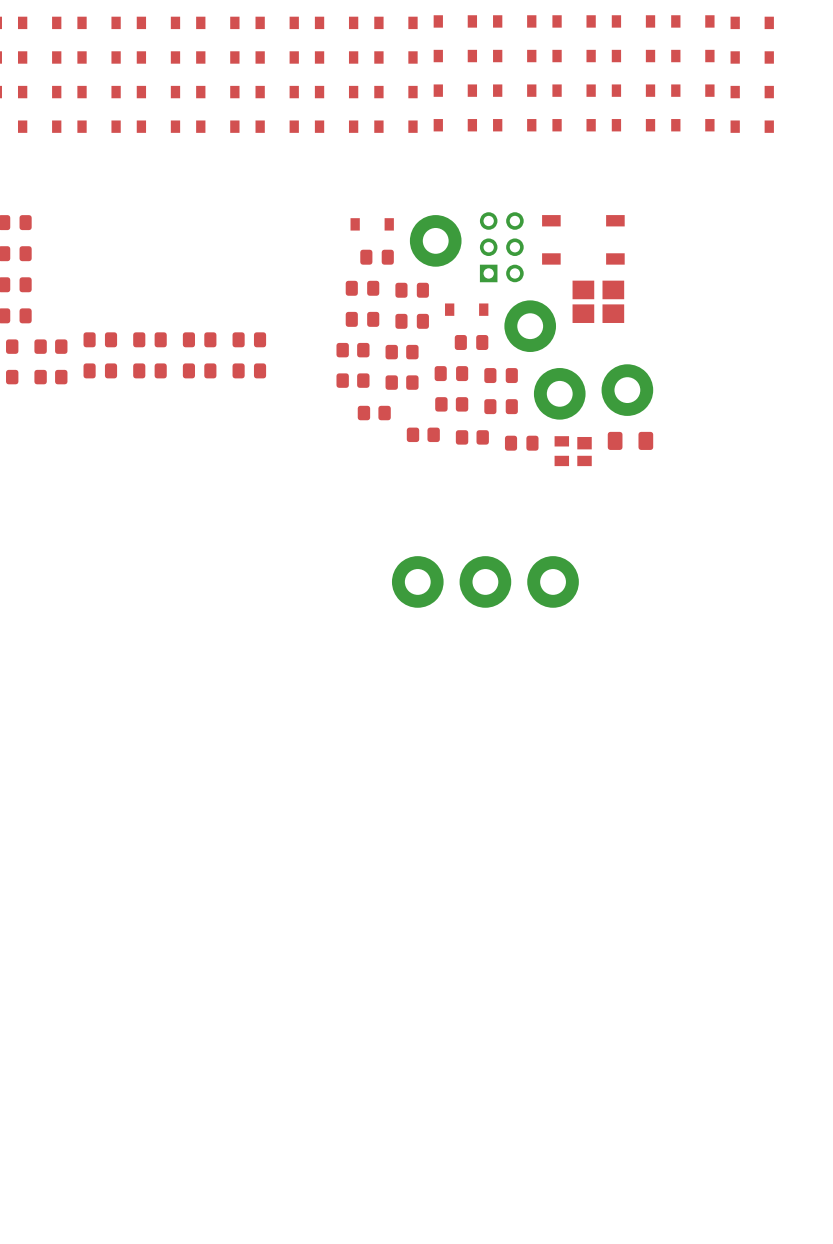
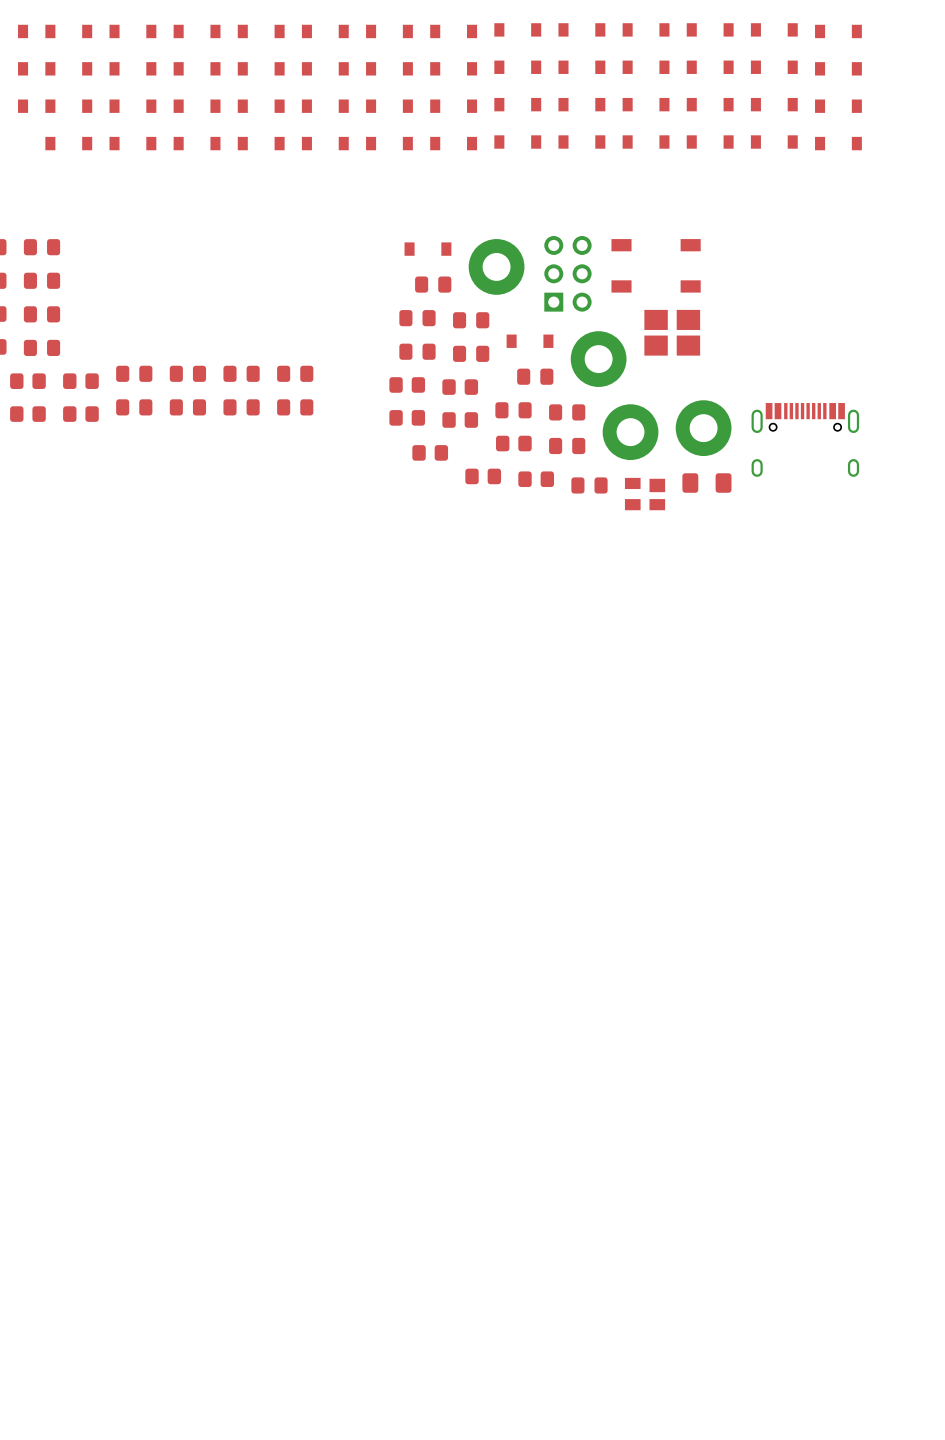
part: none -> (805, 439)
part: (417, 581) -> none
part: (485, 581) -> none
part: (553, 581) -> none

